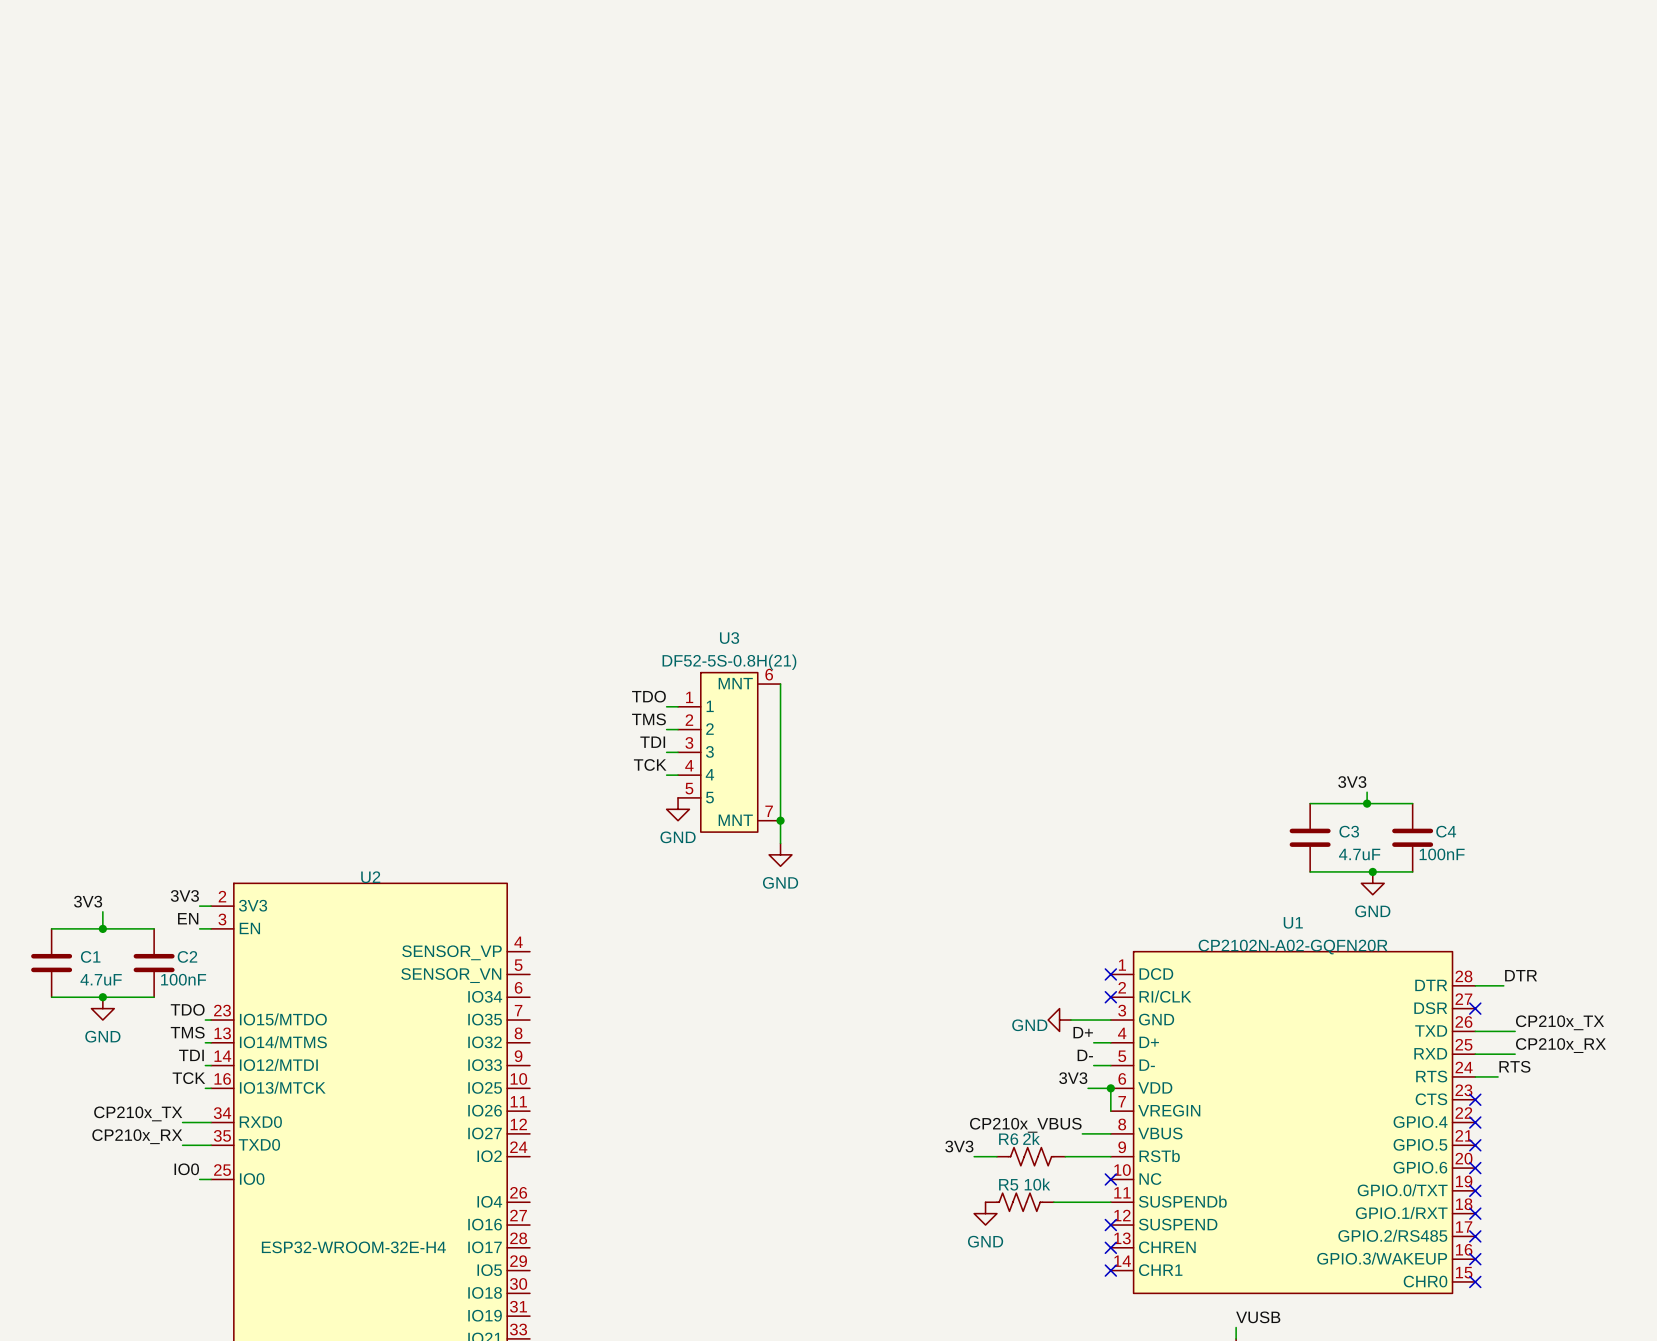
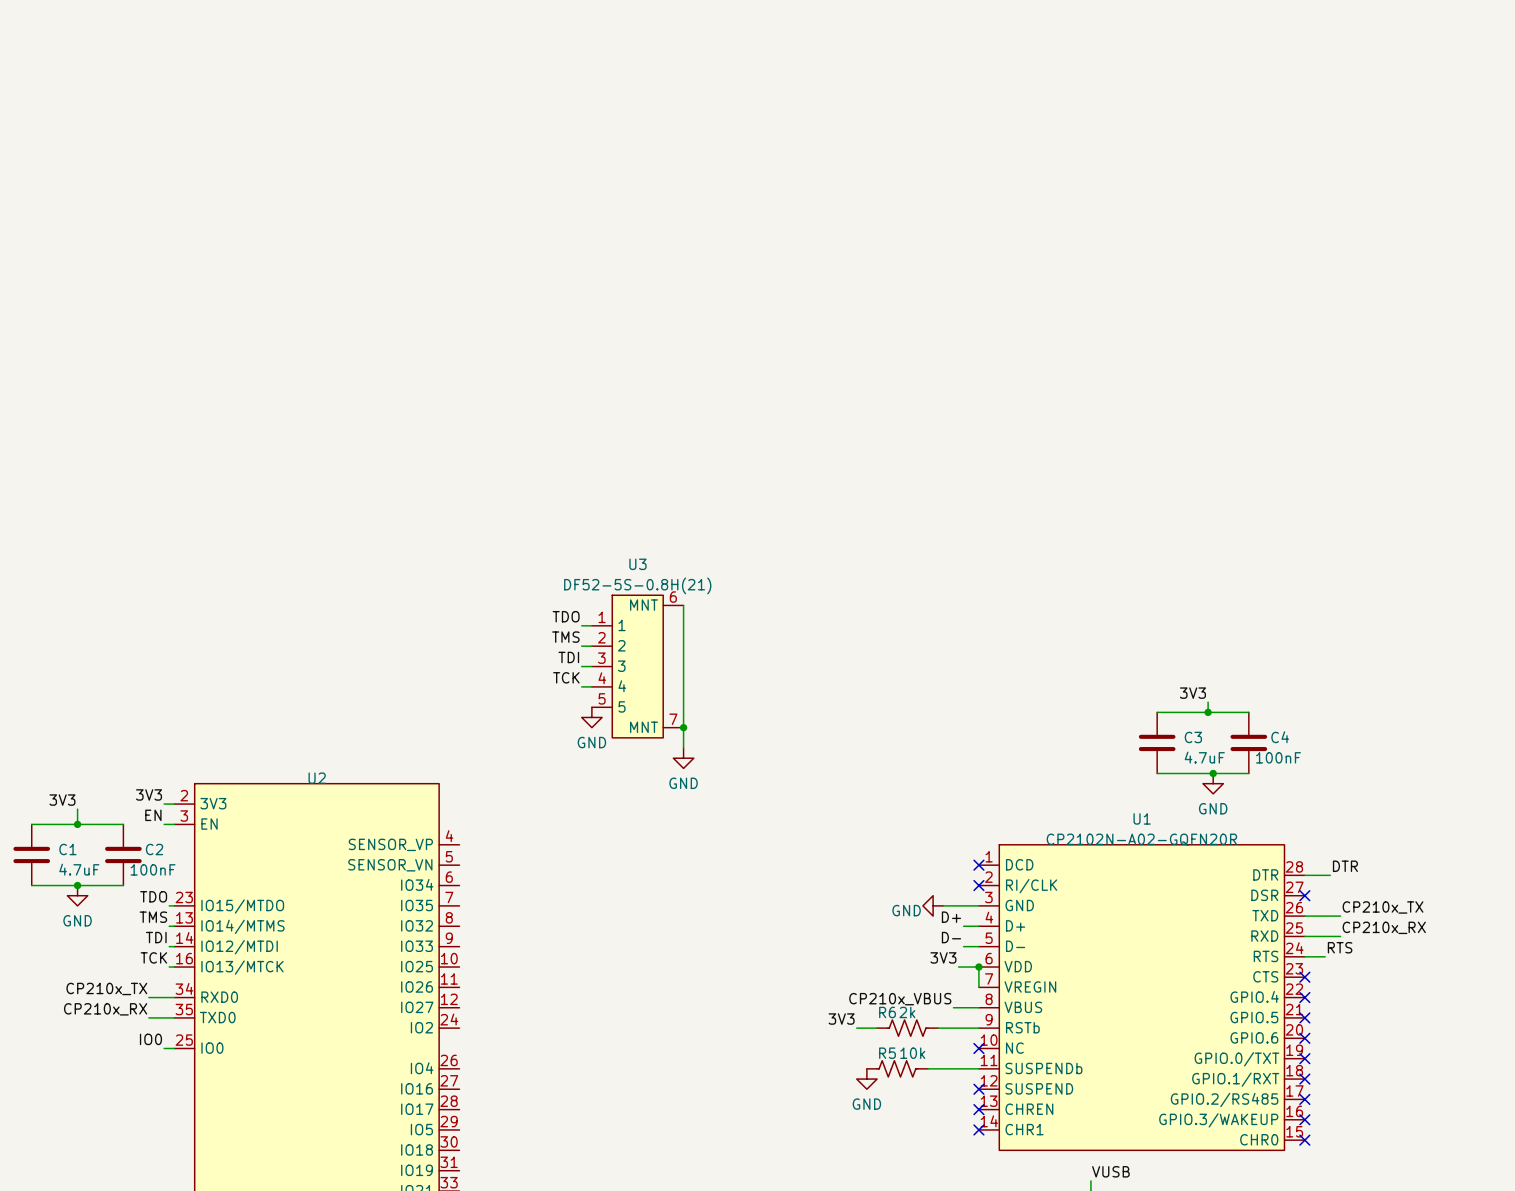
U2 value: ESP32-WROOM-32E-H4 (353, 1247) -> none

